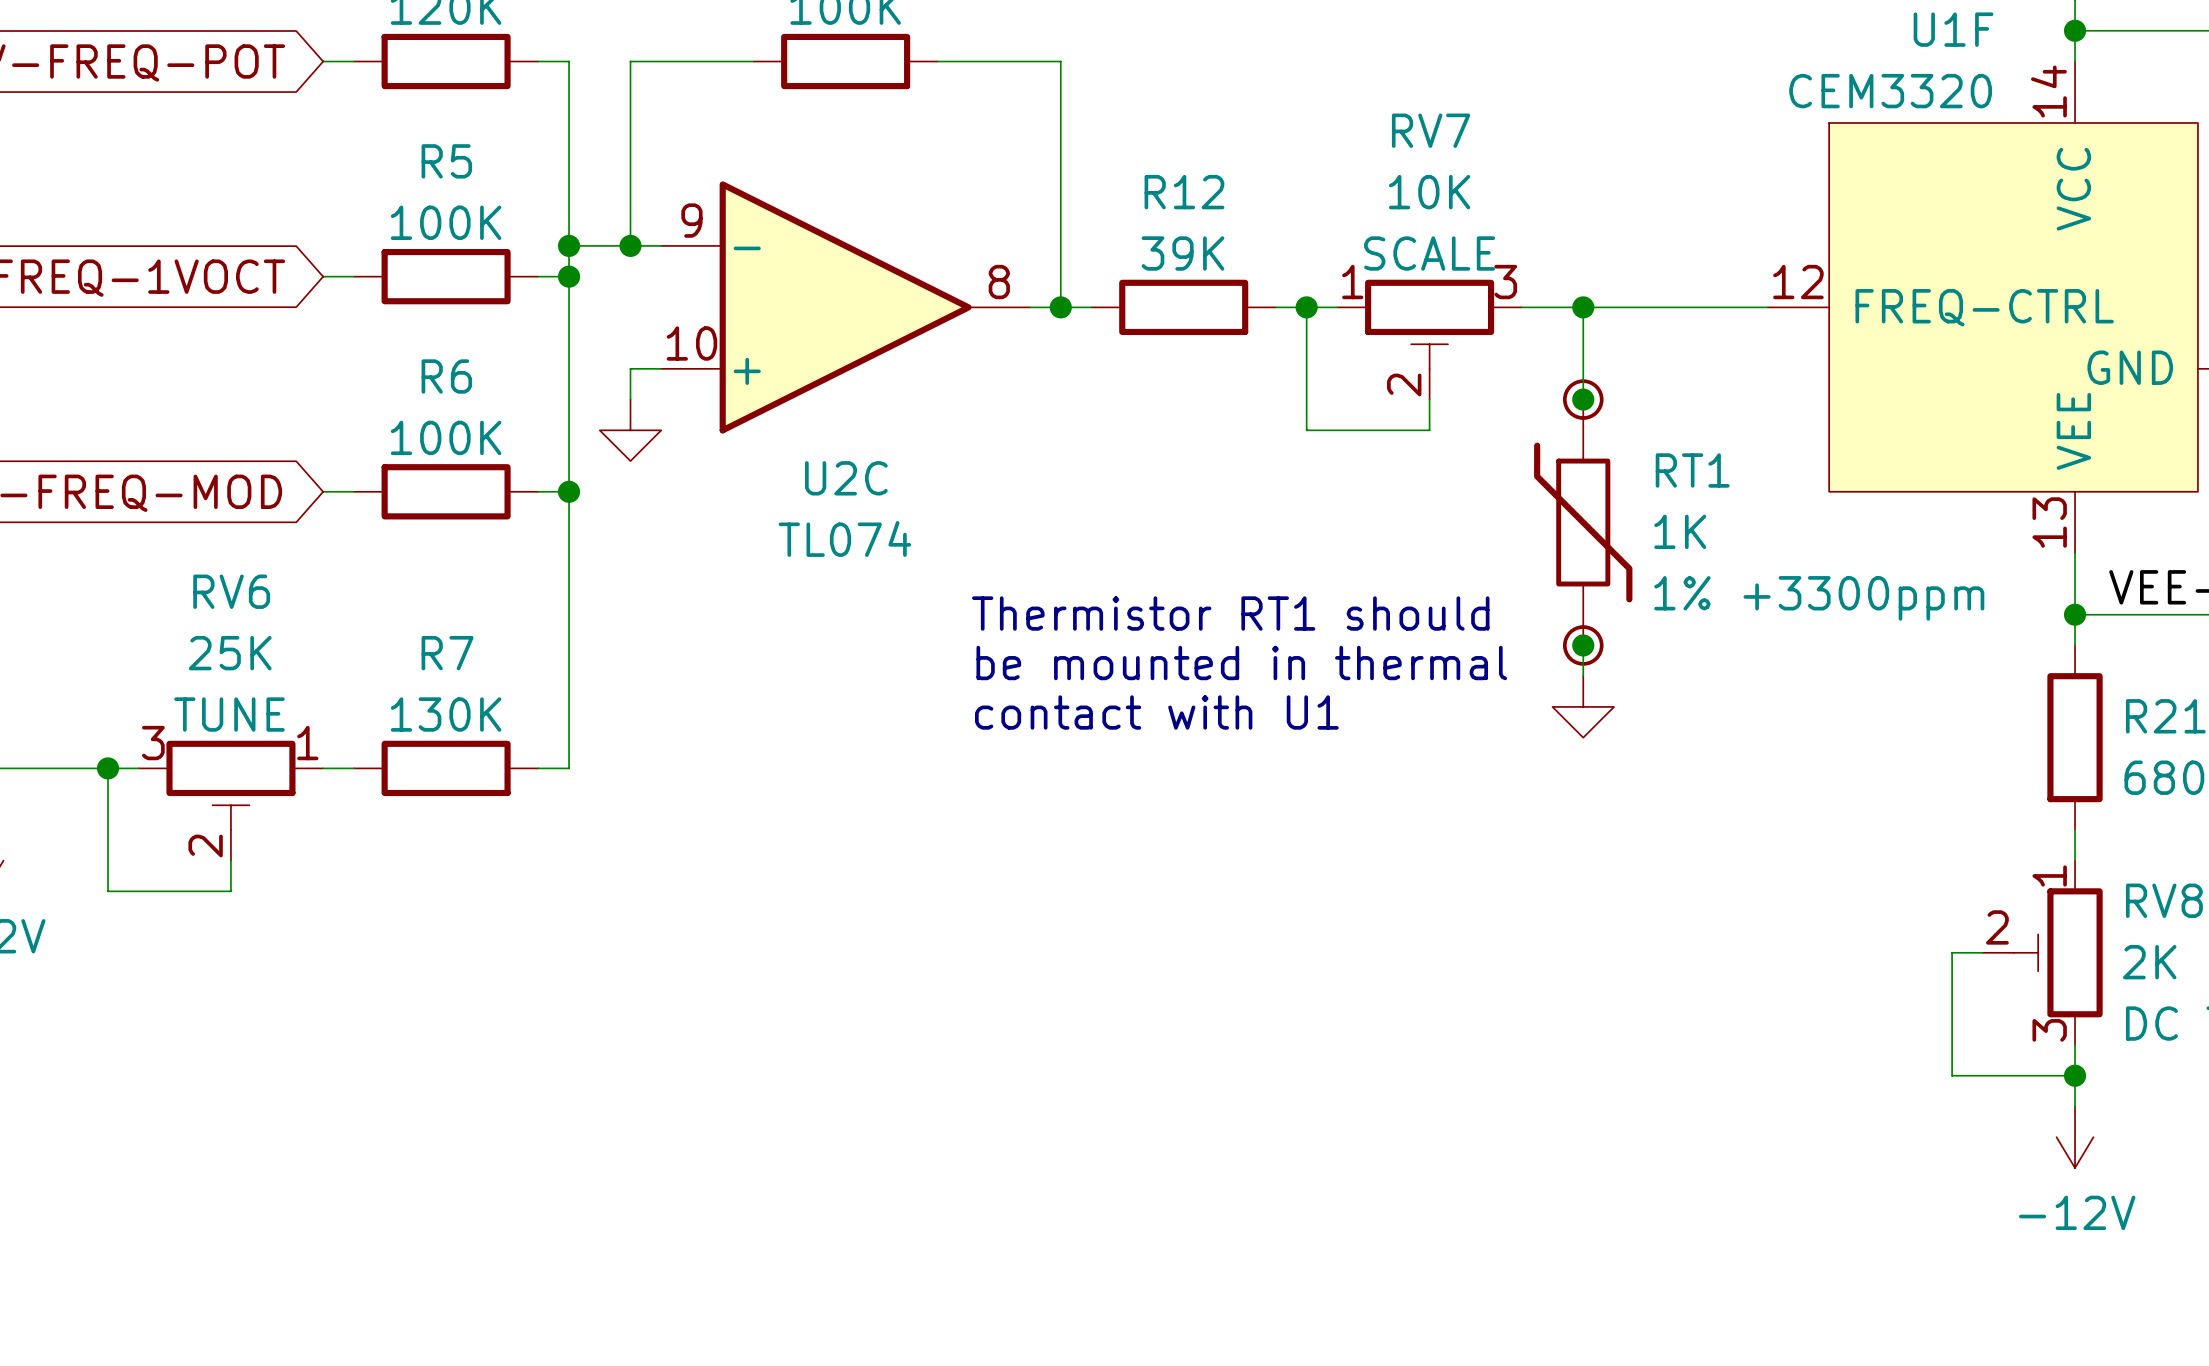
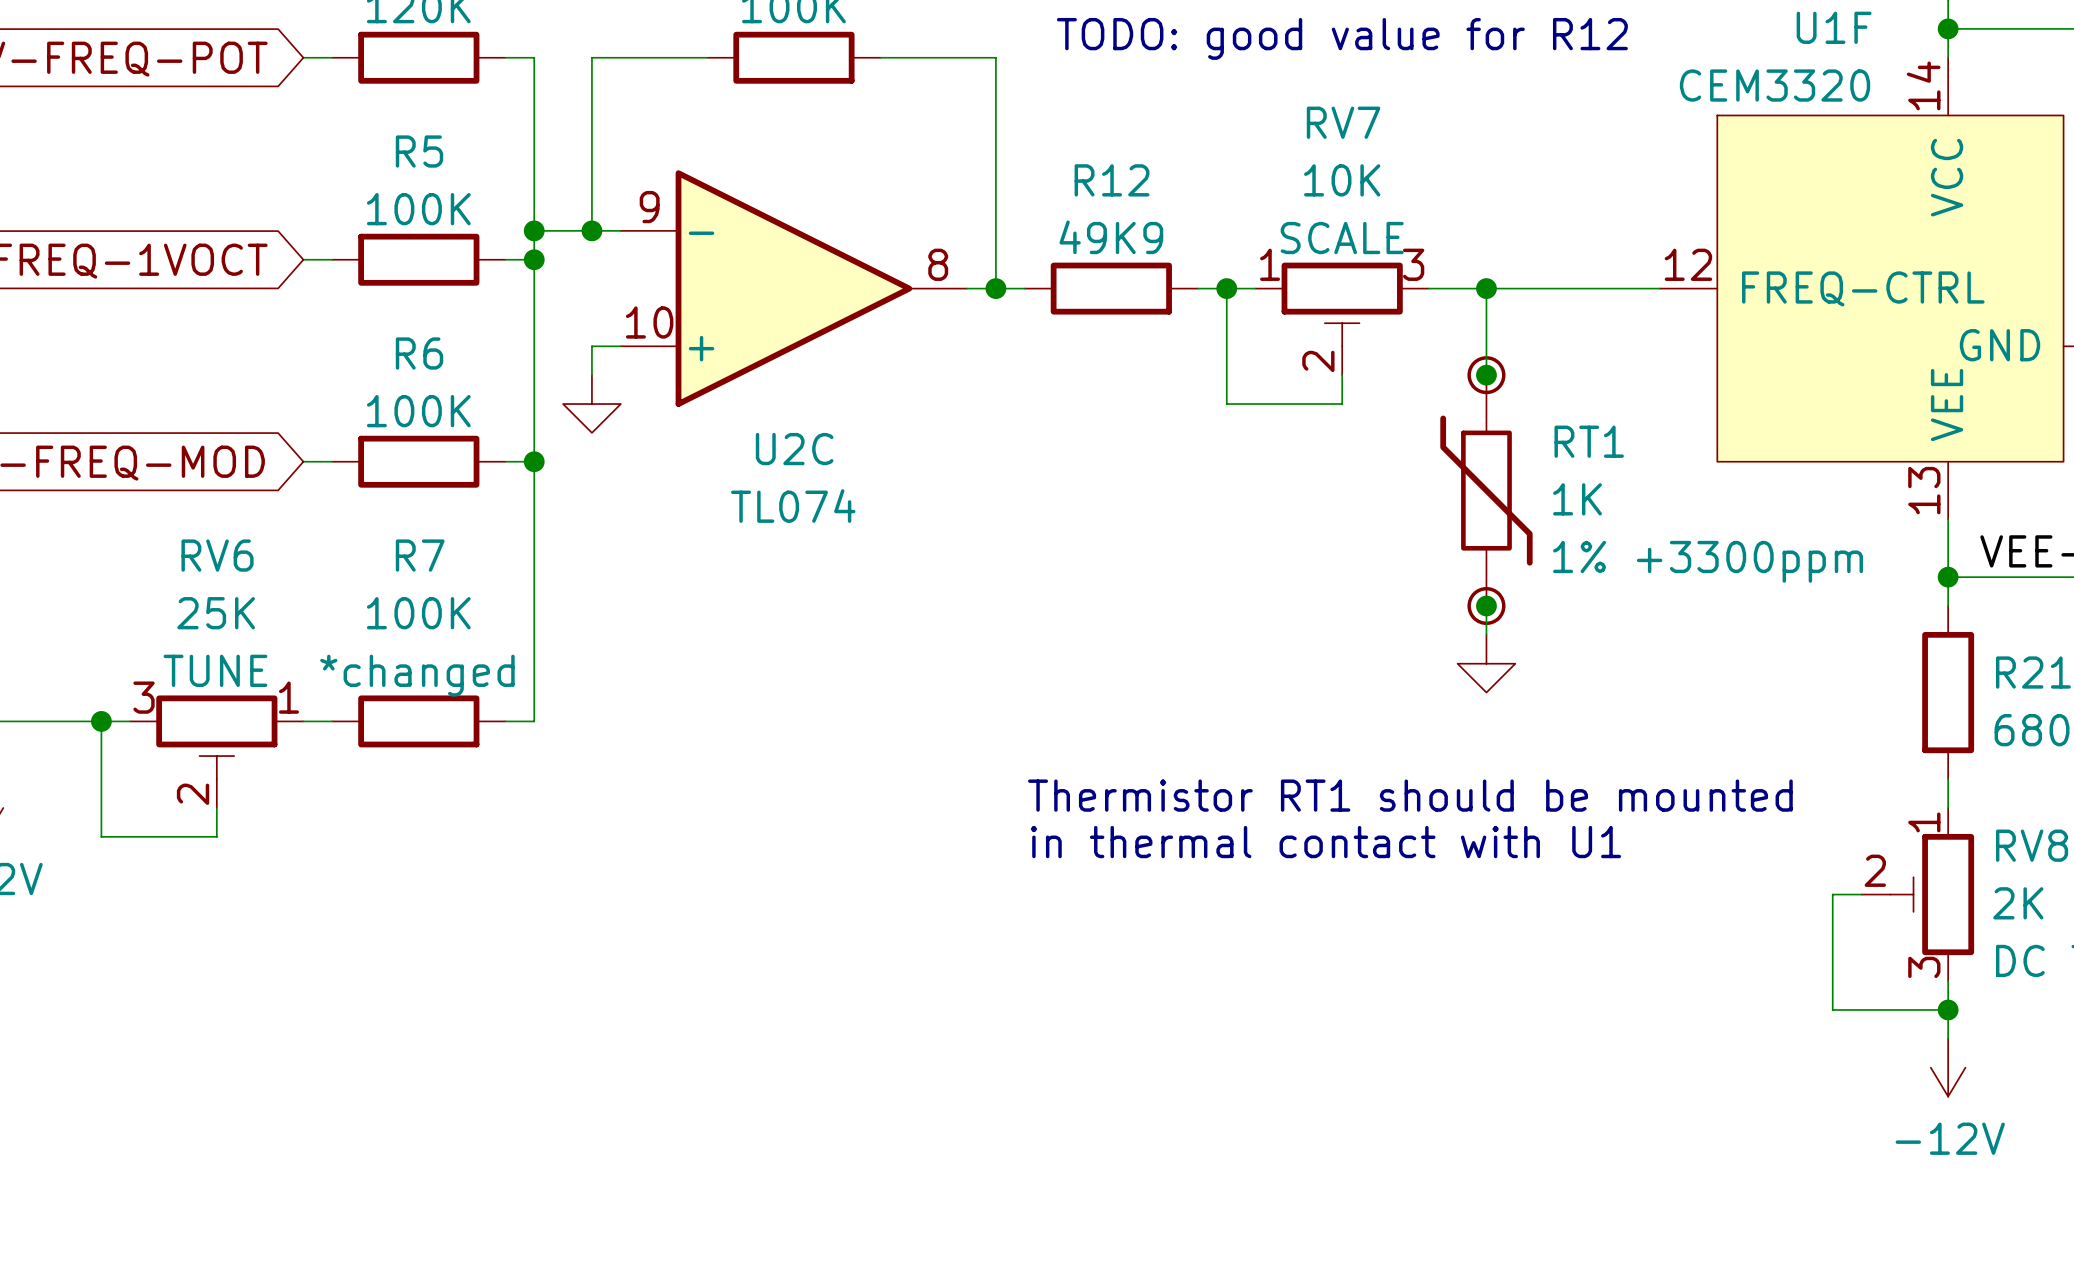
text: none -> TODO: good value for R12 (1342, 38)
R12 value: 39K (1182, 253) -> 49K9 (1111, 237)
text: Thermistor RT1 should (1230, 613) -> none
R7 name position: R7 (447, 653) -> R7 (420, 555)
text: be mounted in thermal (1241, 663) -> none
text: contact with U1 (1156, 712) -> none
R7 value: 130K (446, 714) -> 100K (418, 613)
R7 text: none -> *changed (417, 675)
text: none -> Thermistor RT1 should be mounted (1410, 795)
text: none -> in thermal contact with U1 (1325, 842)

